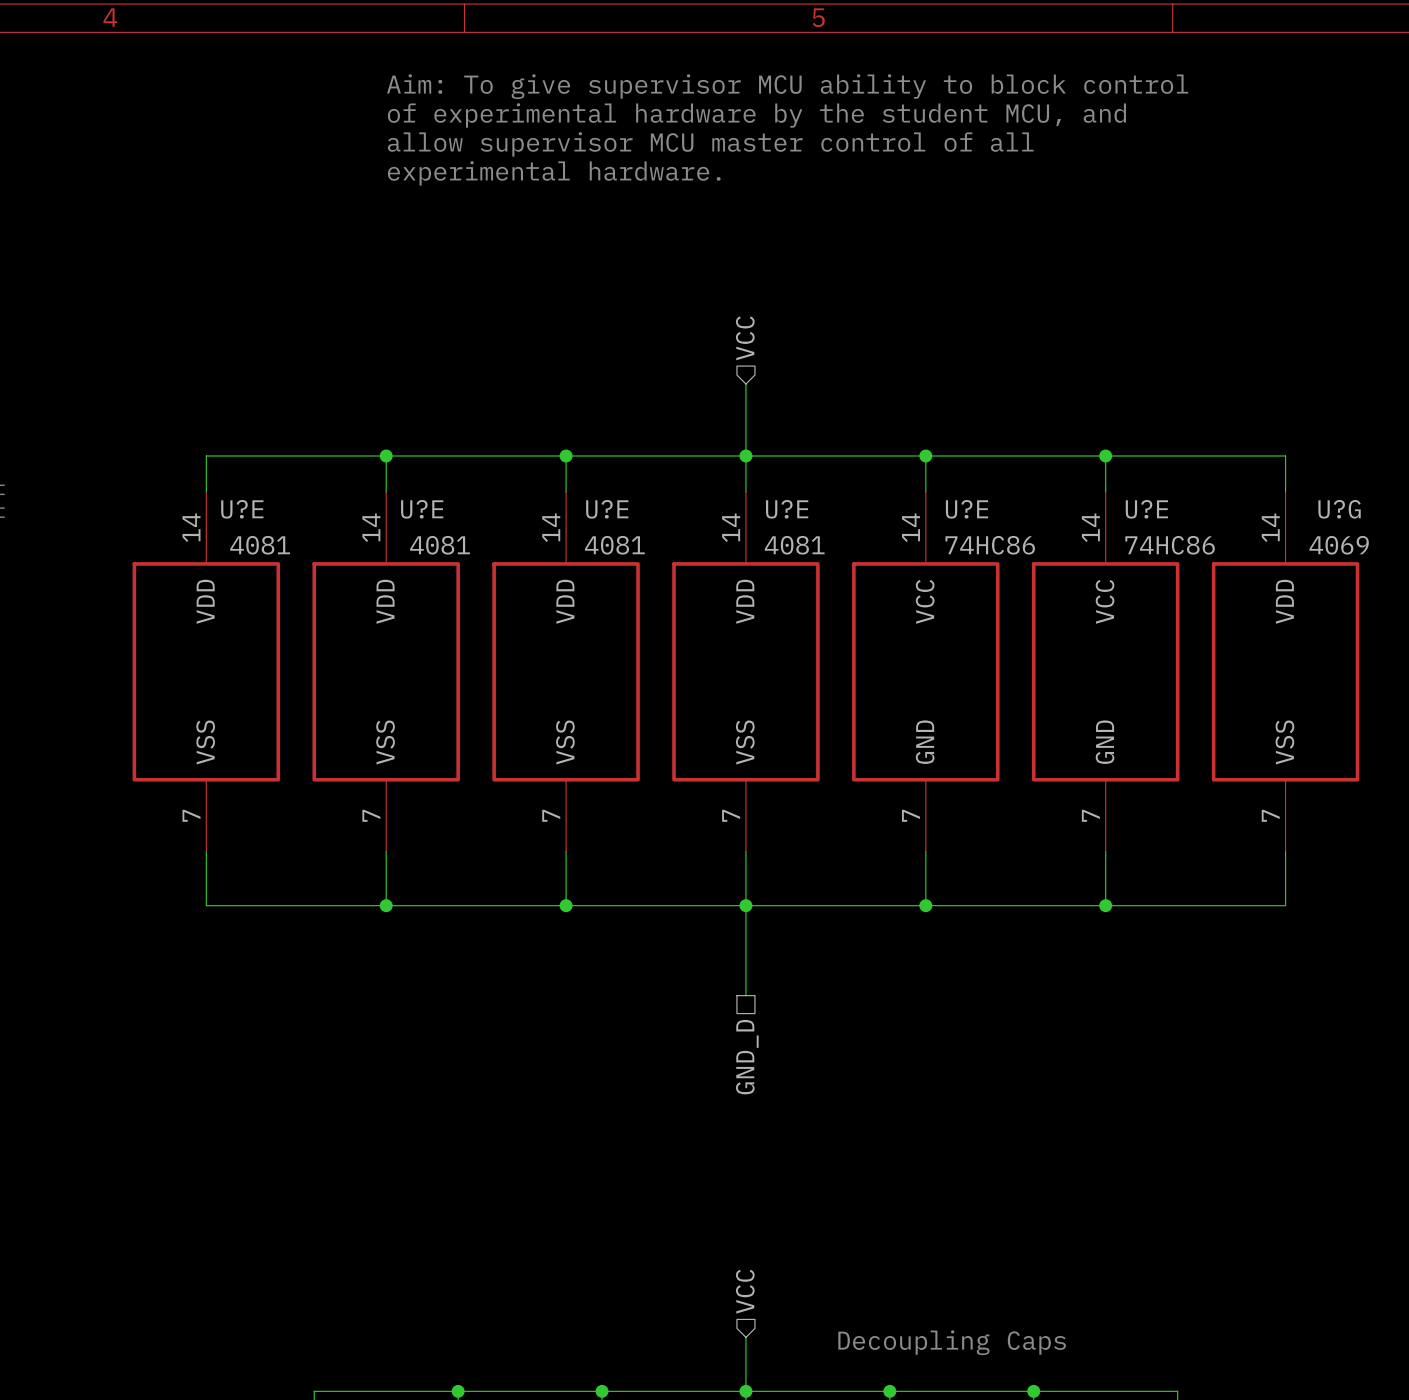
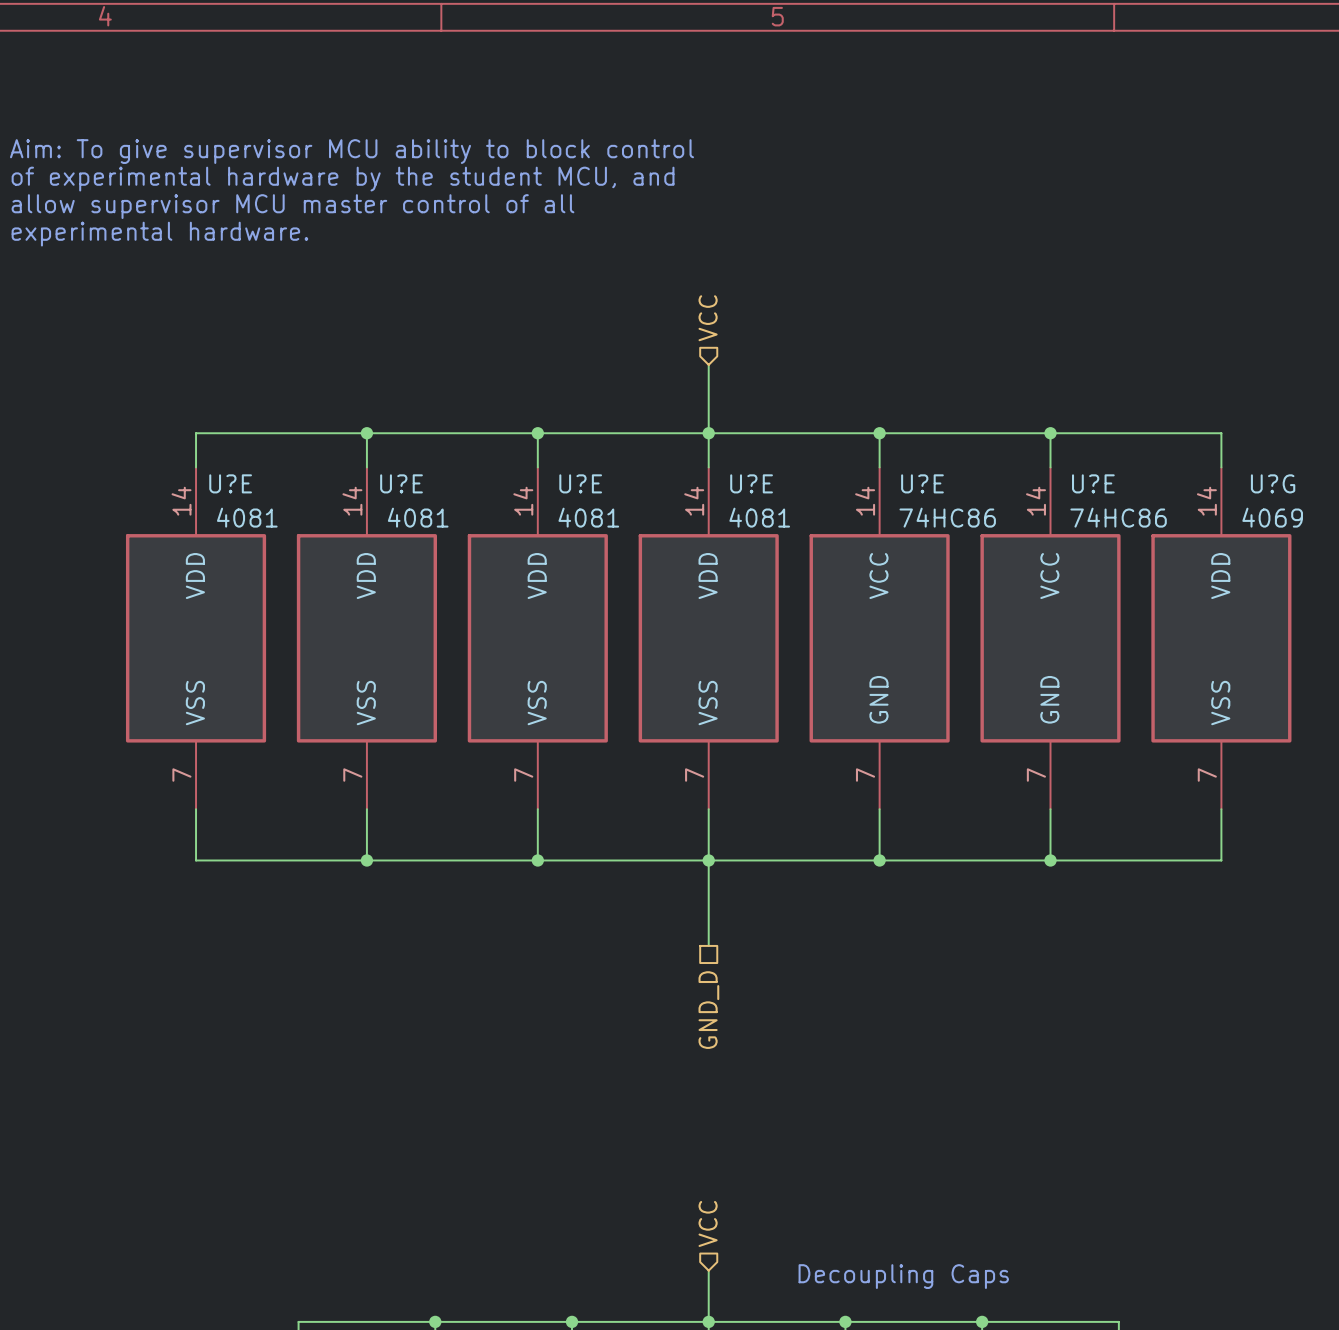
text: Aim: To give supervisor MCU ability to block control (787, 86) -> none
text: of experimental hardware by the student MCU, and (756, 115) -> none
text: allow supervisor MCU master control of all (710, 144) -> none
text: none -> Aim: To give supervisor MCU ability to block control (352, 151)
text: experimental hardware. (554, 173) -> none
text: none -> of experimental hardware by the student MCU, and (343, 179)
text: none -> allow supervisor MCU master control of all (293, 206)
text: none -> experimental hardware. (159, 234)

